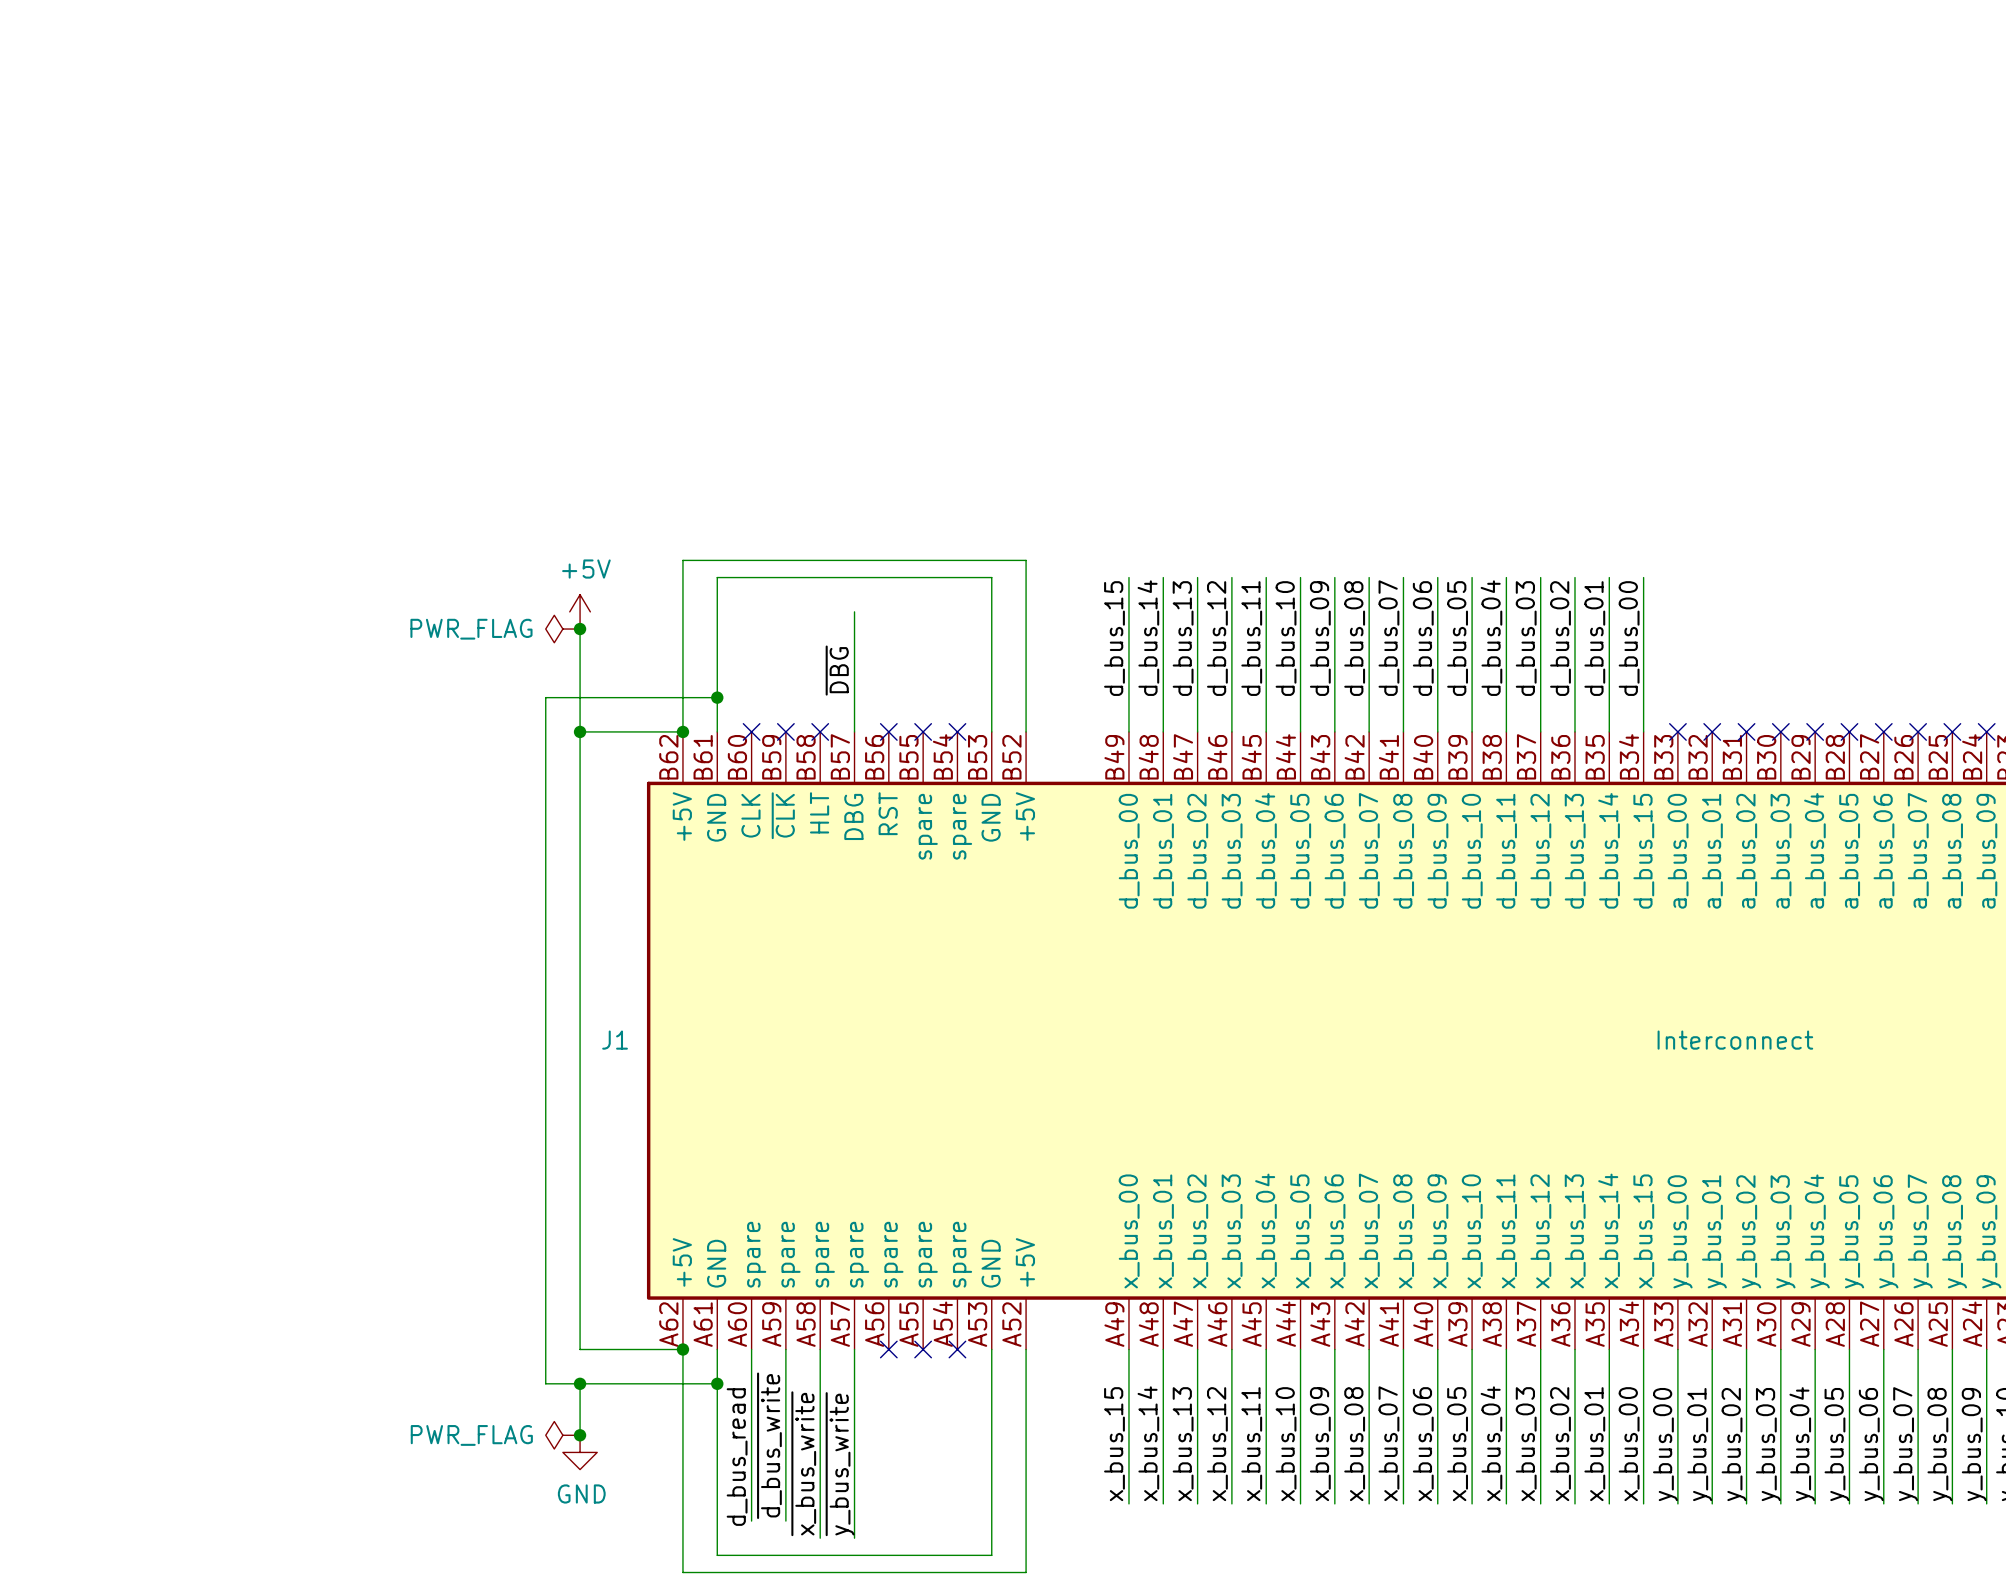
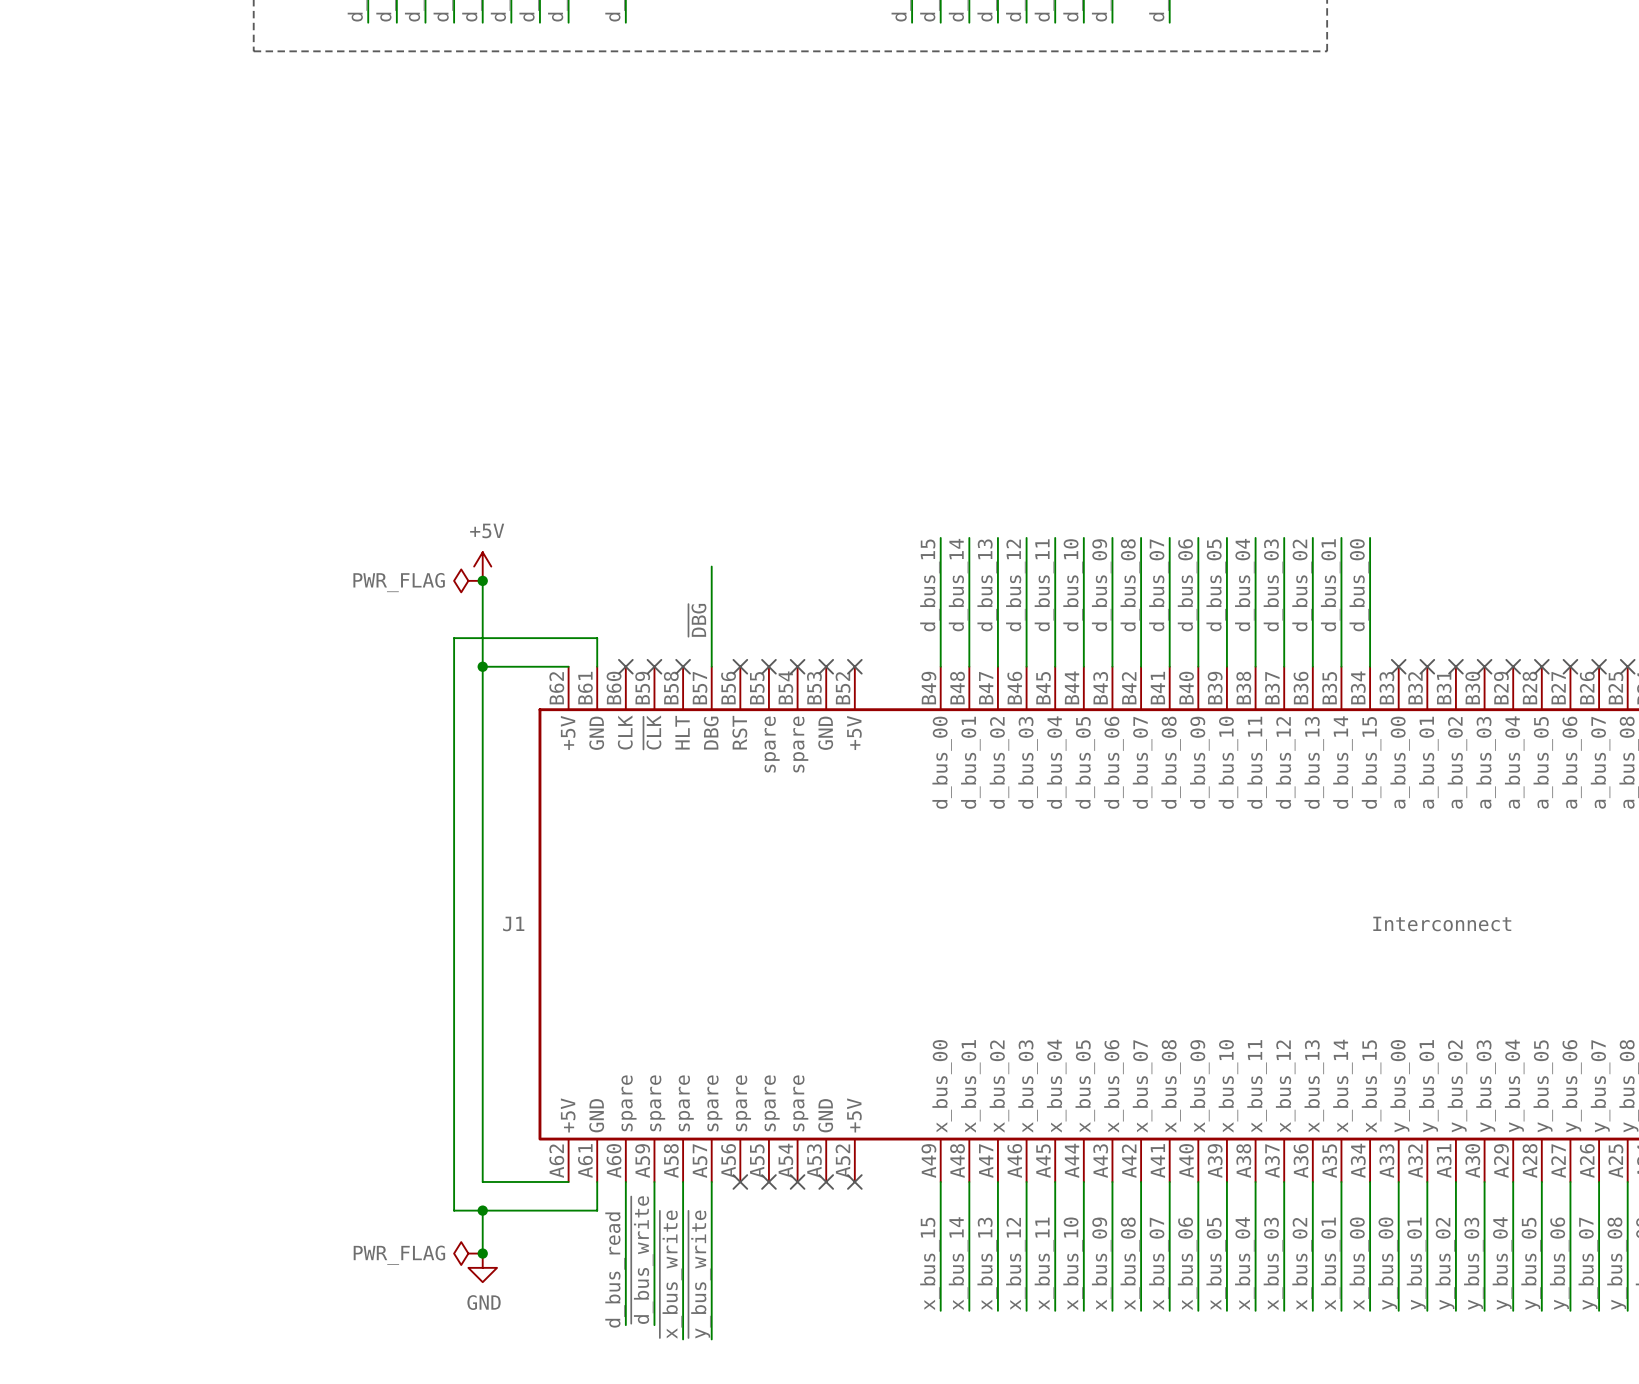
wire: (717, 697) (717, 577) (991, 577) (991, 731) -> none
junction: (717, 697) -> none
wire: (682, 731) (682, 560) (1026, 560) (1026, 731) -> none
junction: (682, 731) -> none
no-connect mark: none -> (826, 666)
no-connect mark: none -> (854, 666)
wire: (682, 1349) (682, 1572) (1026, 1572) (1026, 1349) -> none
junction: (682, 1349) -> none
wire: (991, 1349) (991, 1555) (717, 1555) (717, 1383) -> none
no-connect mark: none -> (826, 1181)
no-connect mark: none -> (854, 1181)
junction: (717, 1383) -> none

